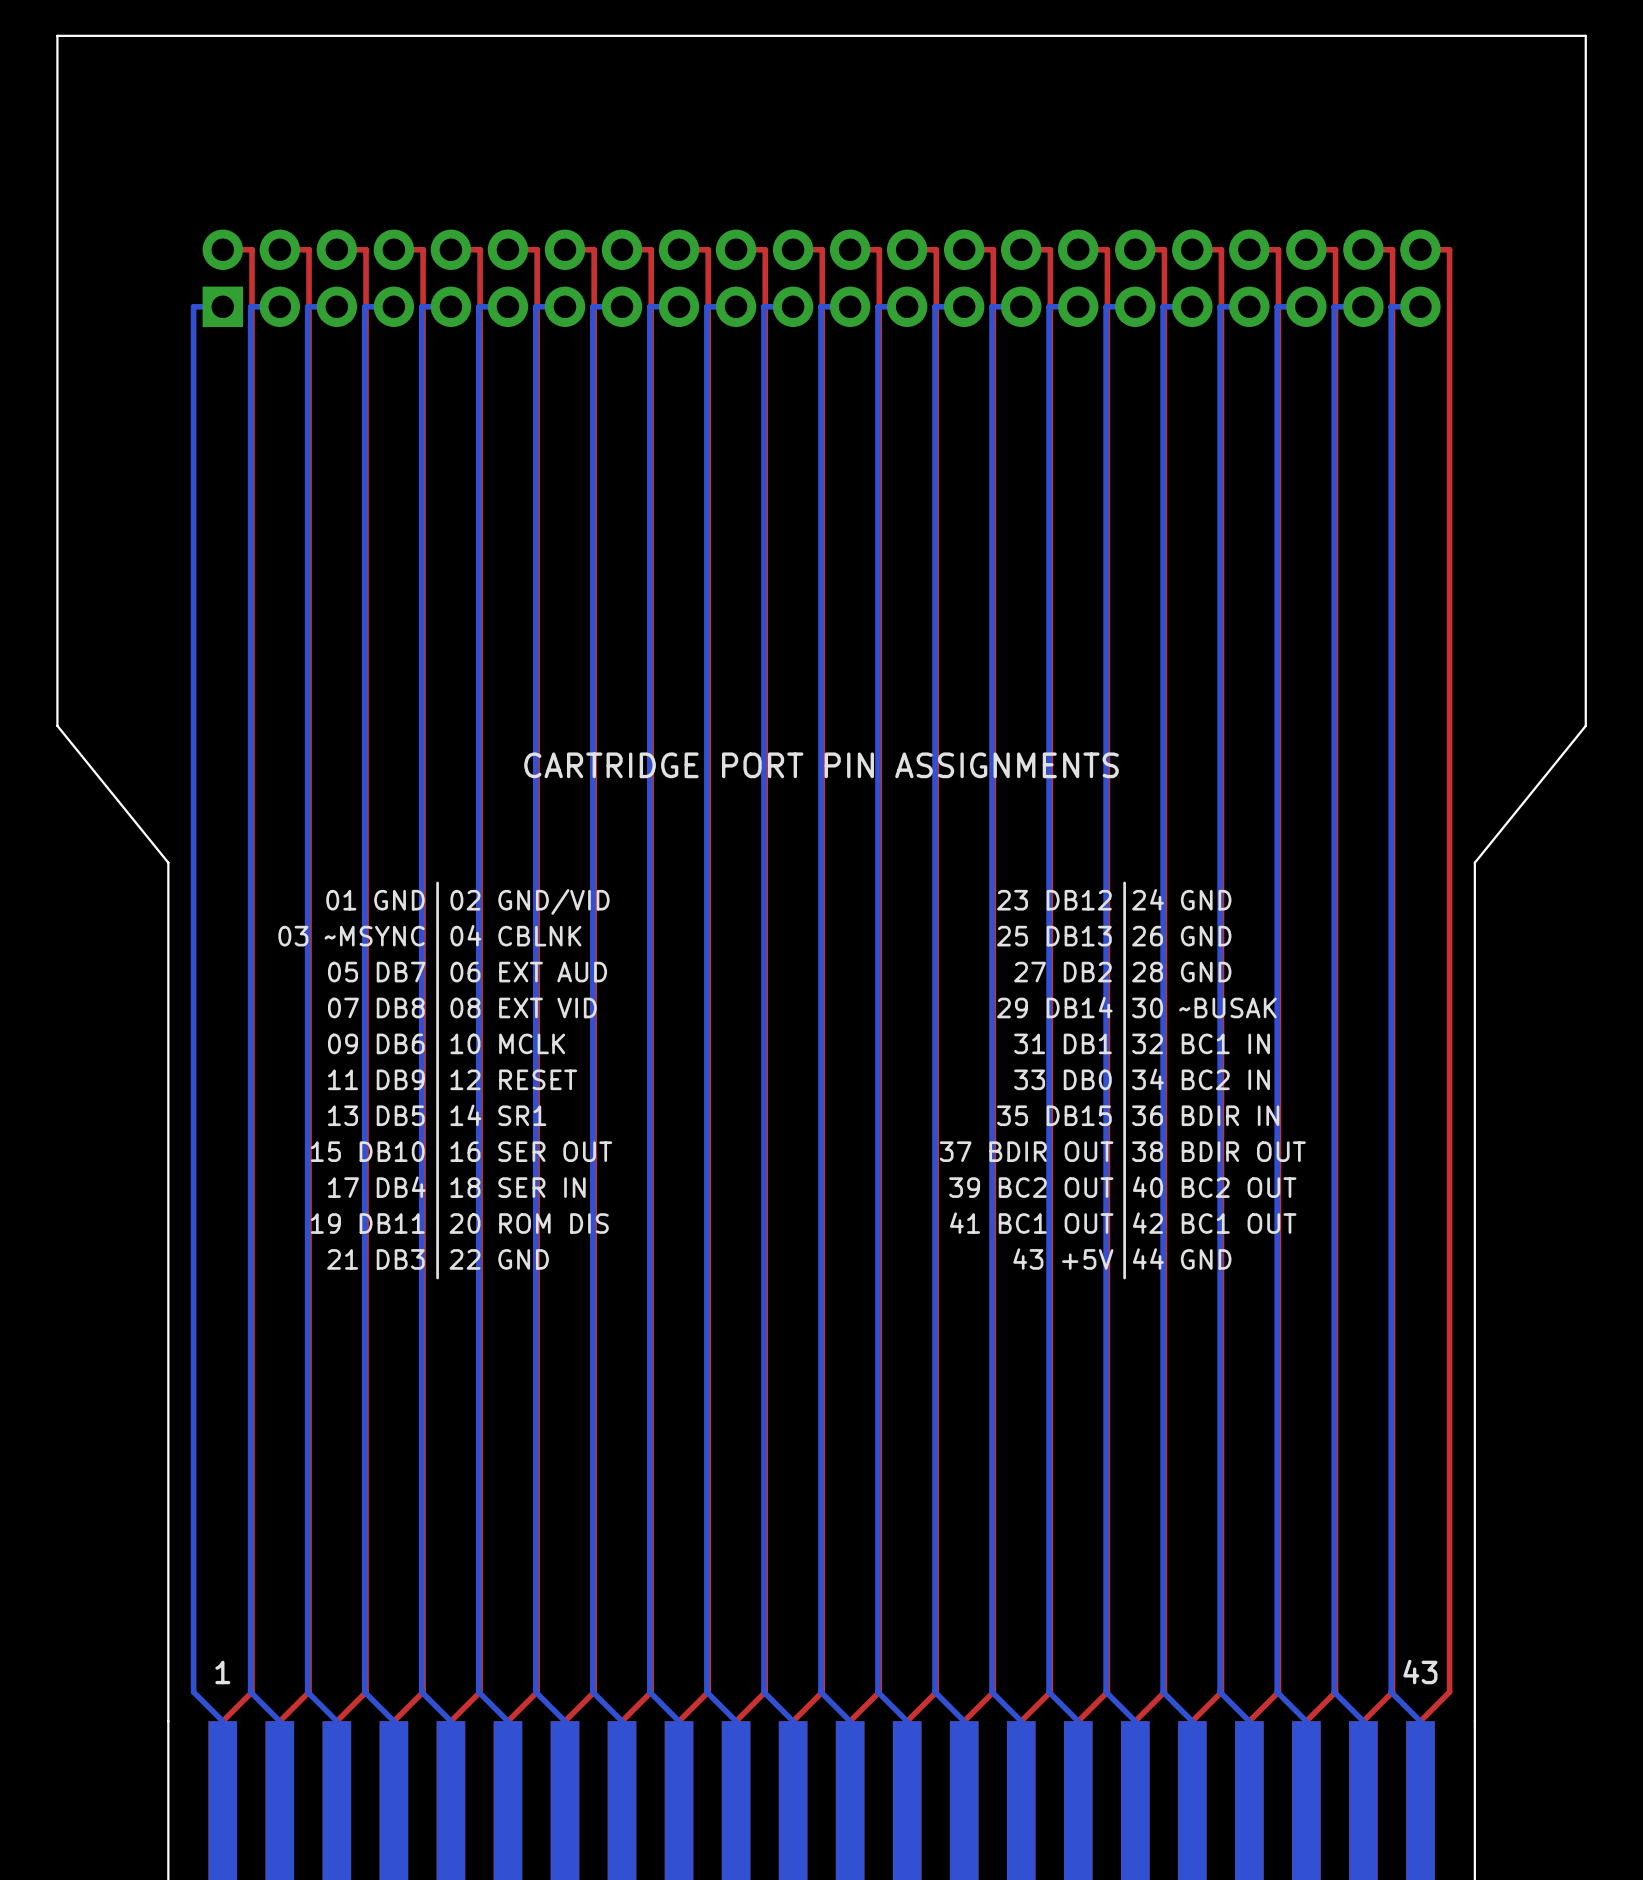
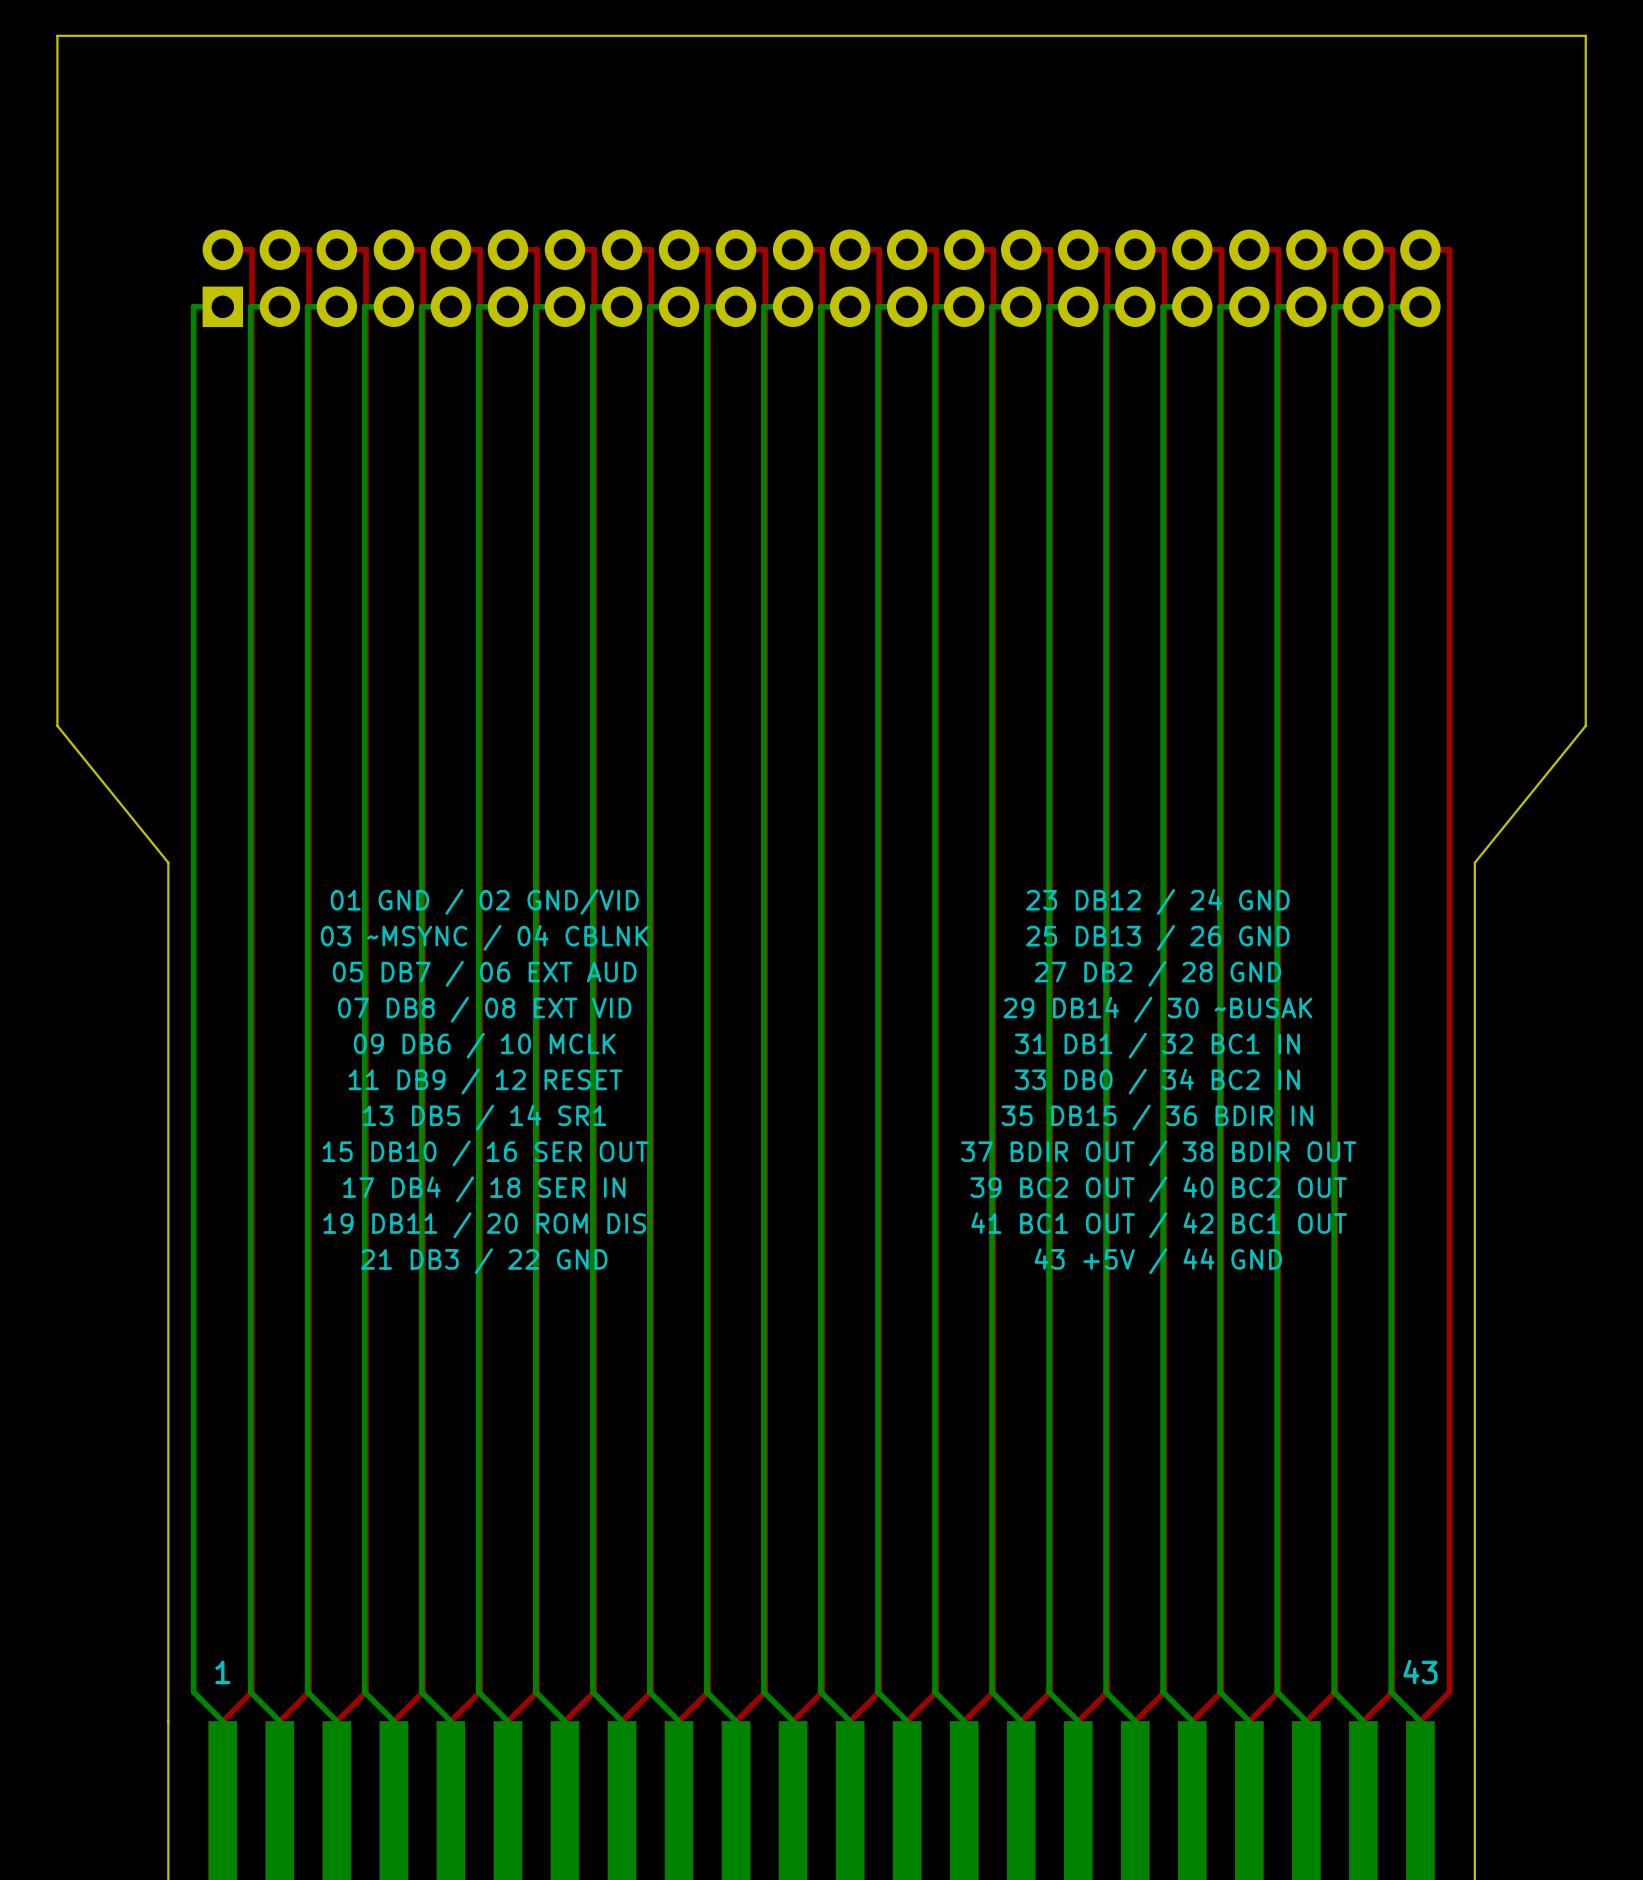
text: CARTRIDGE PORT PIN ASSIGNMENTS (821, 765) -> none
line: (437, 882) (437, 1278) -> none
line: (1124, 882) (1124, 1278) -> none
text: 24 GND (1181, 899) -> none
text: 01 GND (375, 900) -> none
text: 23 DB12 (1054, 900) -> 23 DB12 / 24 GND (1157, 901)
text: 02 GND/VID (530, 901) -> 01 GND / 02 GND/VID (484, 901)
text: 04 CBLNK (515, 935) -> none
text: 03 ~MSYNC (351, 936) -> 03 ~MSYNC / 04 CBLNK (484, 937)
text: 25 DB13 (1054, 936) -> 25 DB13 / 26 GND (1157, 937)
text: 26 GND (1181, 936) -> none
text: 05 DB7 (376, 972) -> none
text: 06 EXT AUD (528, 972) -> 05 DB7 / 06 EXT AUD (484, 973)
text: 27 DB2 (1062, 972) -> none
text: 28 GND (1181, 972) -> none
text: none -> 27 DB2 / 28 GND (1157, 973)
text: 07 DB8 (376, 1007) -> none
text: 08 EXT VID (523, 1007) -> 07 DB8 / 08 EXT VID (484, 1009)
text: 29 DB14 (1054, 1007) -> none
text: 30 ~BUSAK (1204, 1007) -> 29 DB14 / 30 ~BUSAK (1157, 1009)
text: 09 DB6 (376, 1043) -> none
text: 10 MCLK (507, 1043) -> 09 DB6 / 10 MCLK (484, 1045)
text: 31 DB1 (1062, 1043) -> none
text: 32 BC1 IN (1201, 1043) -> 31 DB1 / 32 BC1 IN (1157, 1045)
text: 11 DB9 (376, 1079) -> none
text: 12 RESET (513, 1079) -> 11 DB9 / 12 RESET (485, 1081)
text: 33 DB0 (1062, 1079) -> none
text: 34 BC2 IN (1201, 1079) -> 33 DB0 / 34 BC2 IN (1157, 1081)
text: 13 DB5 (376, 1115) -> none
text: 14 SR1 (498, 1115) -> none
text: 35 DB15 (1054, 1115) -> none
text: 36 BDIR IN (1205, 1115) -> 35 DB15 / 36 BDIR IN (1157, 1117)
text: none -> 13 DB5 / 14 SR1 (484, 1117)
text: 15 DB10 (367, 1151) -> none
text: 16 SER OUT (531, 1151) -> 15 DB10 / 16 SER OUT (485, 1153)
text: 37 BDIR OUT (1026, 1151) -> none
text: 38 BDIR OUT (1218, 1151) -> none
text: none -> 37 BDIR OUT / 38 BDIR OUT (1158, 1153)
text: 17 DB4 (376, 1187) -> none
text: 18 SER IN (518, 1187) -> 17 DB4 / 18 SER IN (484, 1189)
text: 39 BC2 OUT (1031, 1187) -> none
text: 40 BC2 OUT (1214, 1187) -> none
text: none -> 39 BC2 OUT / 40 BC2 OUT (1158, 1189)
text: 19 DB11 (367, 1223) -> none
text: 20 ROM DIS (529, 1223) -> 19 DB11 / 20 ROM DIS (484, 1225)
text: 41 BC1 OUT (1031, 1223) -> none
text: 42 BC1 OUT (1214, 1223) -> none
text: none -> 41 BC1 OUT / 42 BC1 OUT (1159, 1225)
text: 21 DB3 (375, 1259) -> none
text: 22 GND (499, 1259) -> none
text: 43 +5V (1063, 1259) -> none
text: 44 GND (1182, 1259) -> none
text: none -> 21 DB3 / 22 GND (484, 1261)
text: none -> 43 +5V / 44 GND (1158, 1261)

